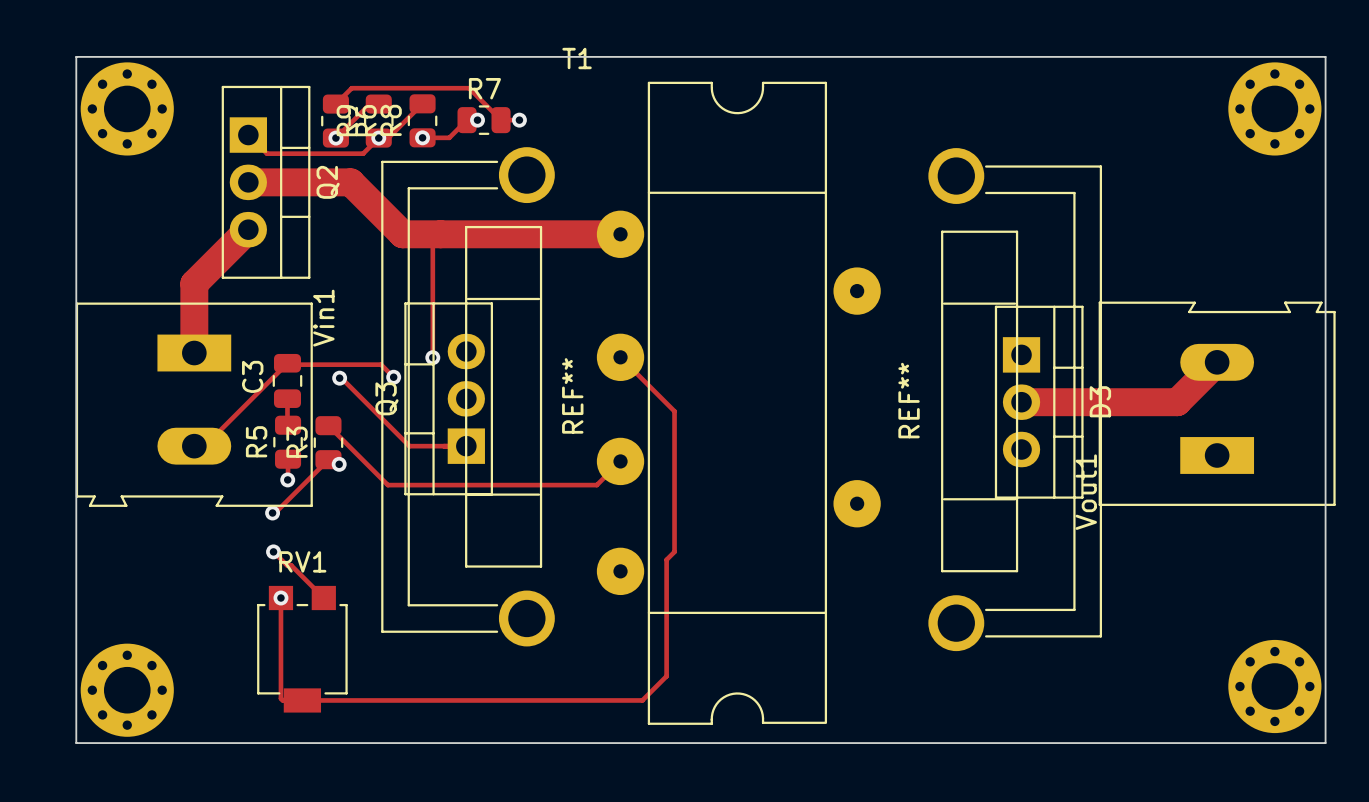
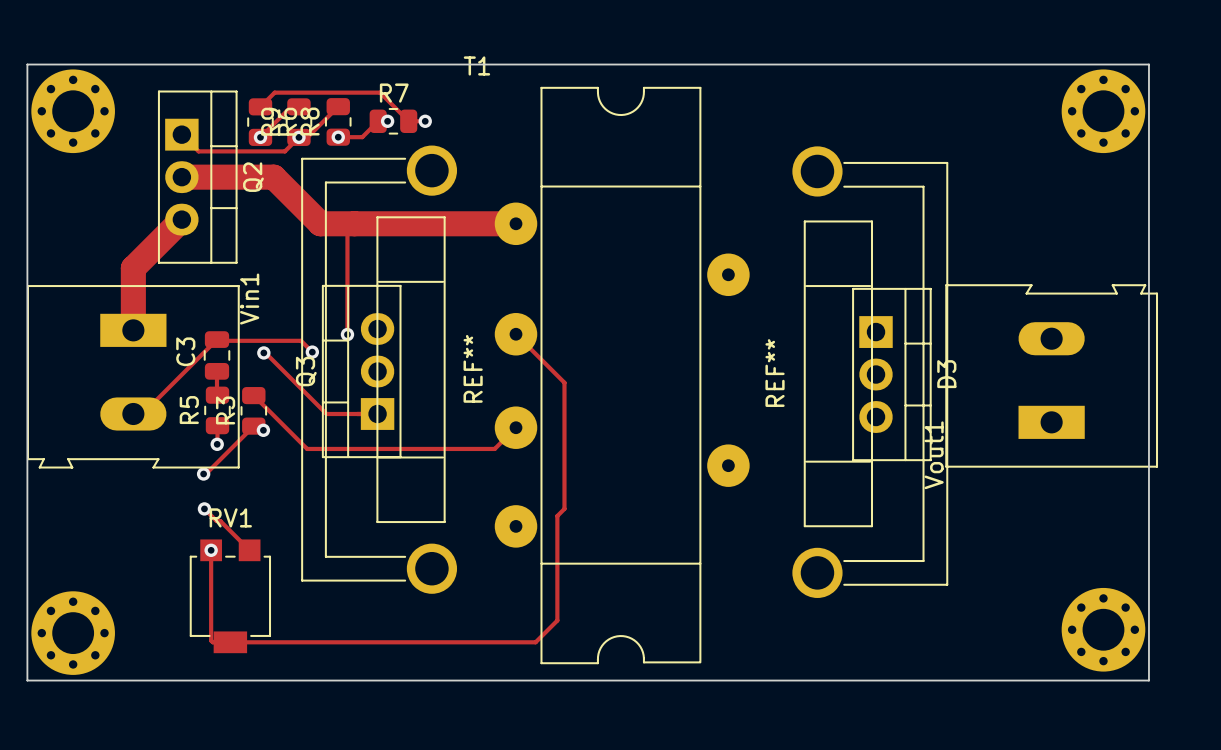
track: (1217, 362) (1177, 402) (1021, 402) -> none

